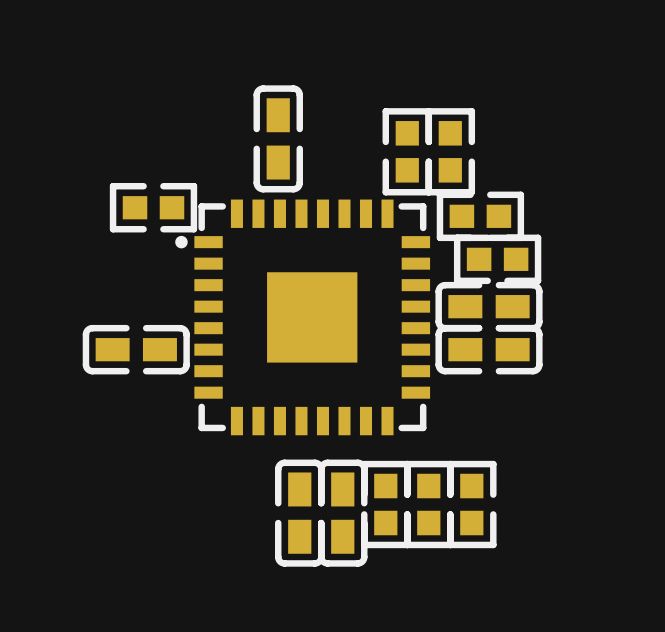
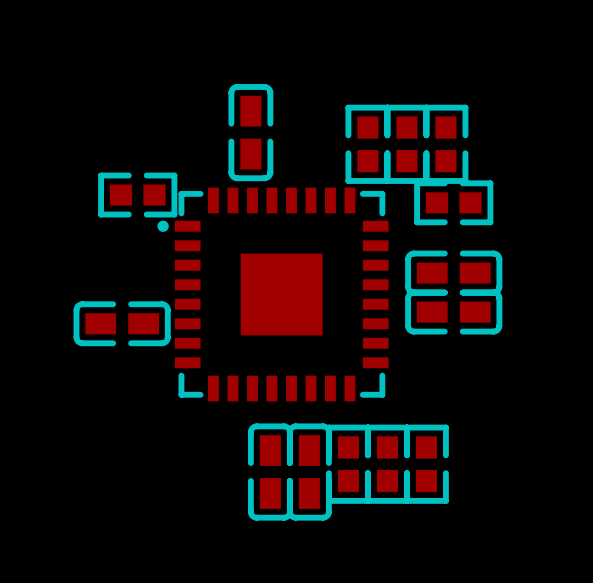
part: none -> (445, 144)
part: (480, 216) -> none
part: none -> (453, 202)
part: (497, 259) -> none
part: none -> (453, 273)
part: (489, 306) -> none
part: none -> (453, 312)
part: (489, 349) -> none

